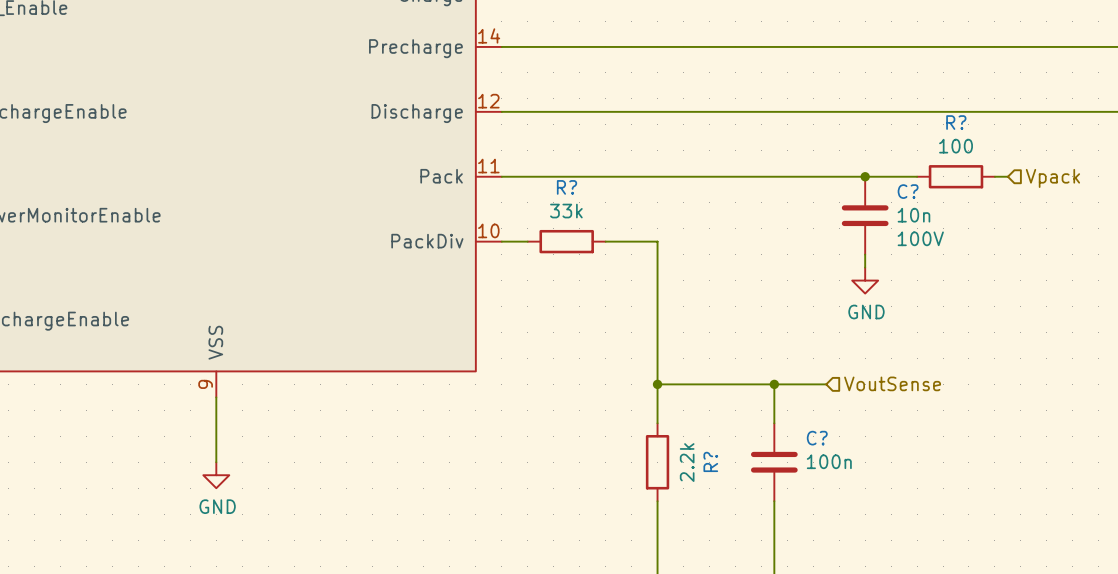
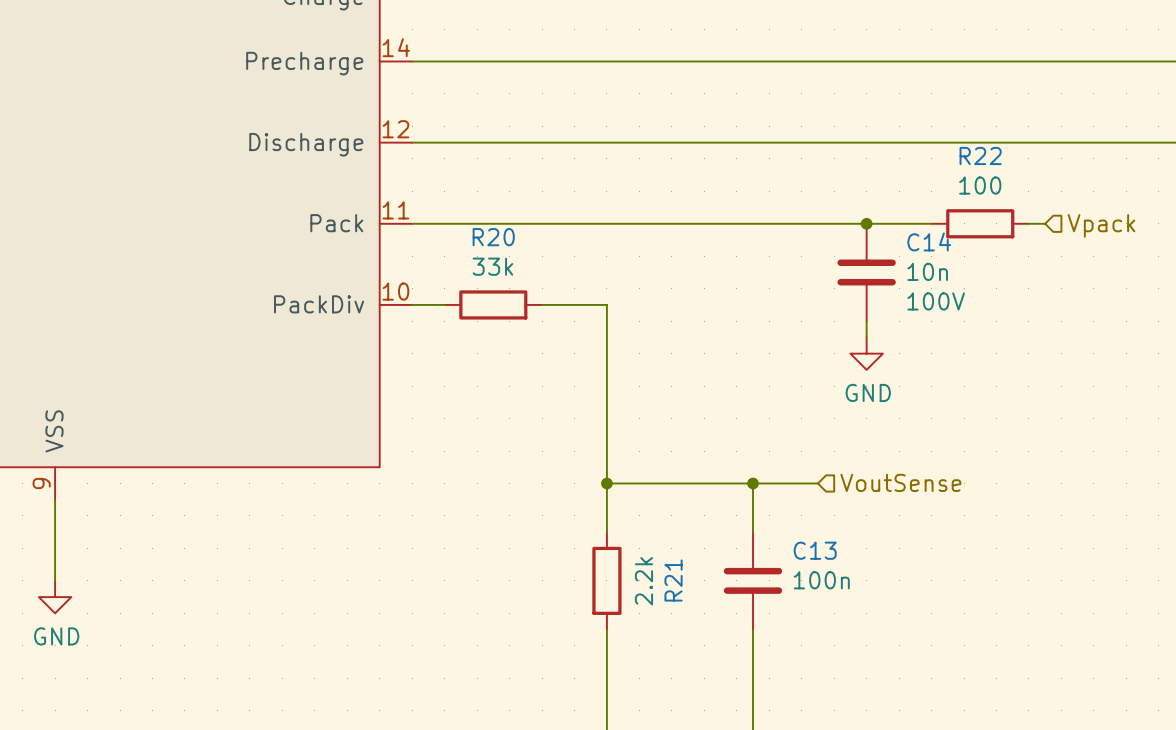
R? name: R? (956, 122) -> R22 (980, 155)
R? name: R? (567, 187) -> R20 (493, 237)
C? name: C? (908, 191) -> C14 (929, 241)
C? name: C? (817, 438) -> C13 (815, 550)
R? name: R? (710, 461) -> R21 (673, 580)

